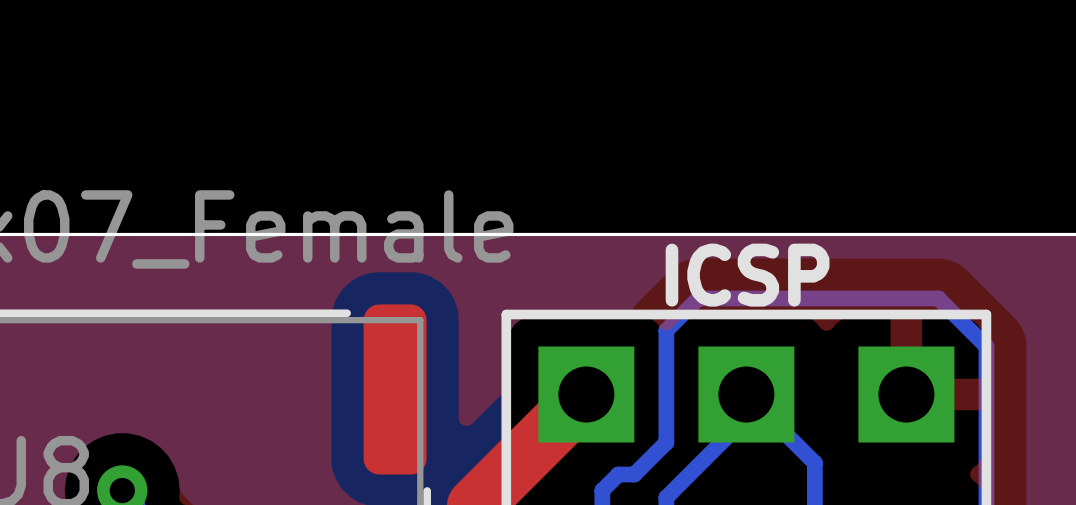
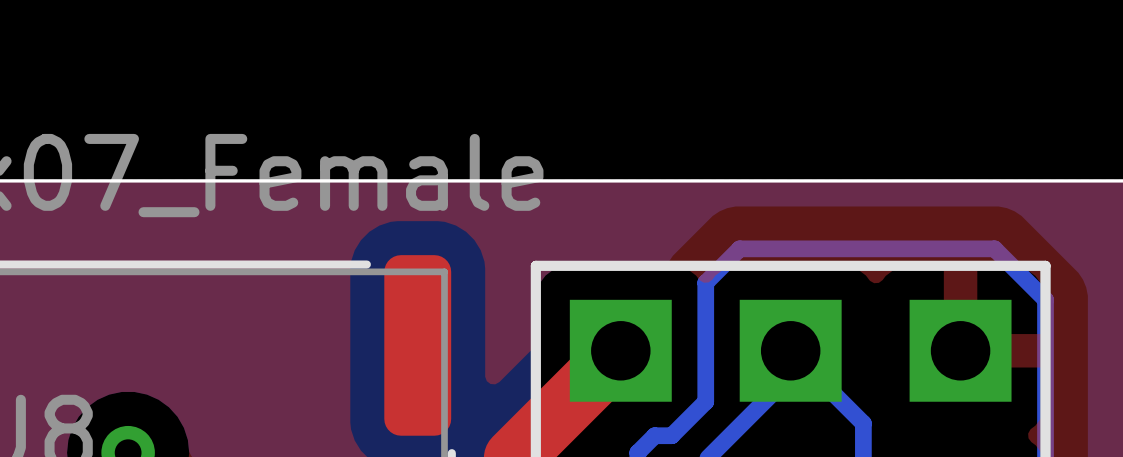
text: ICSP (747, 275) -> none

